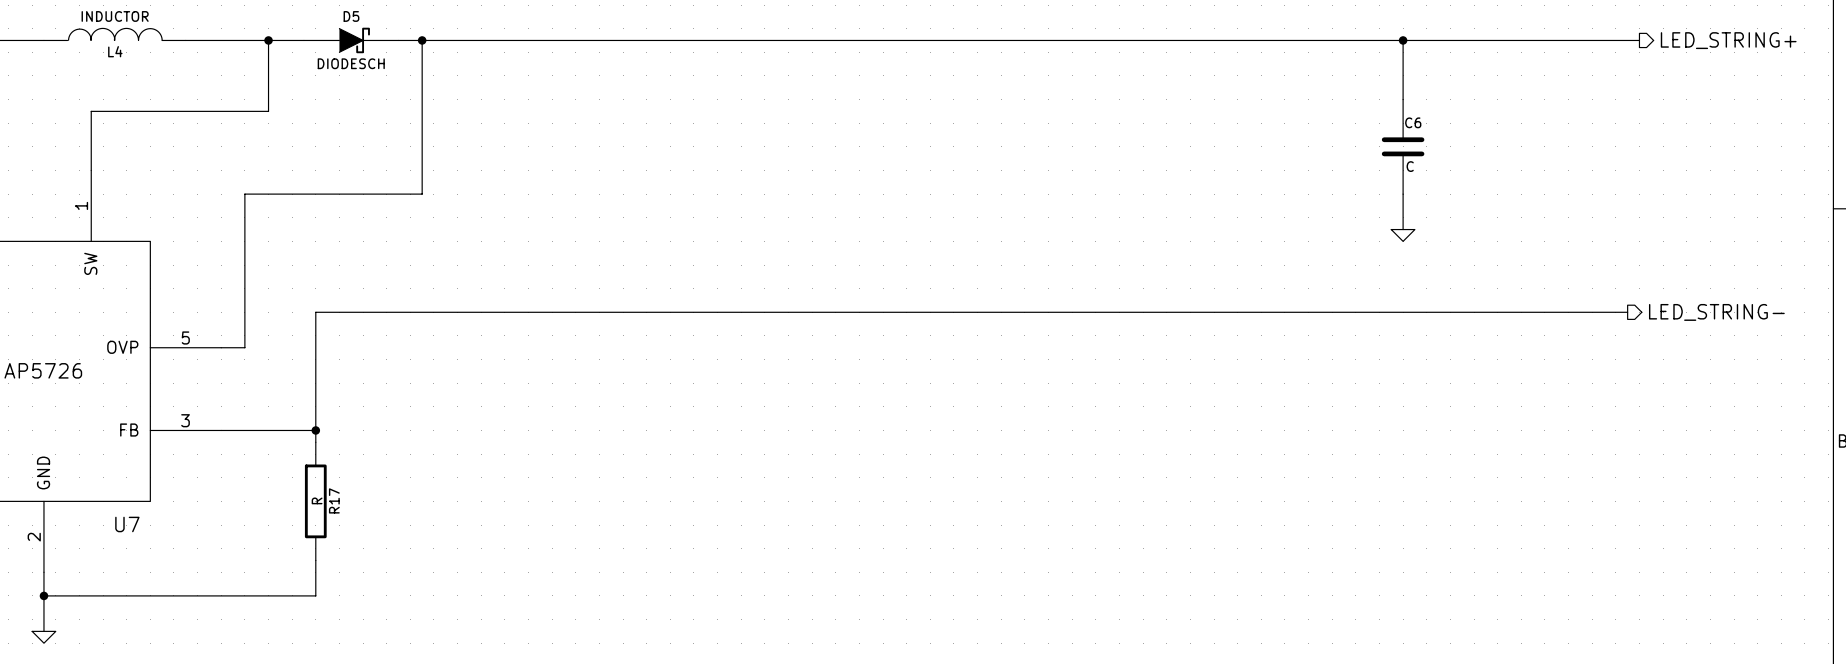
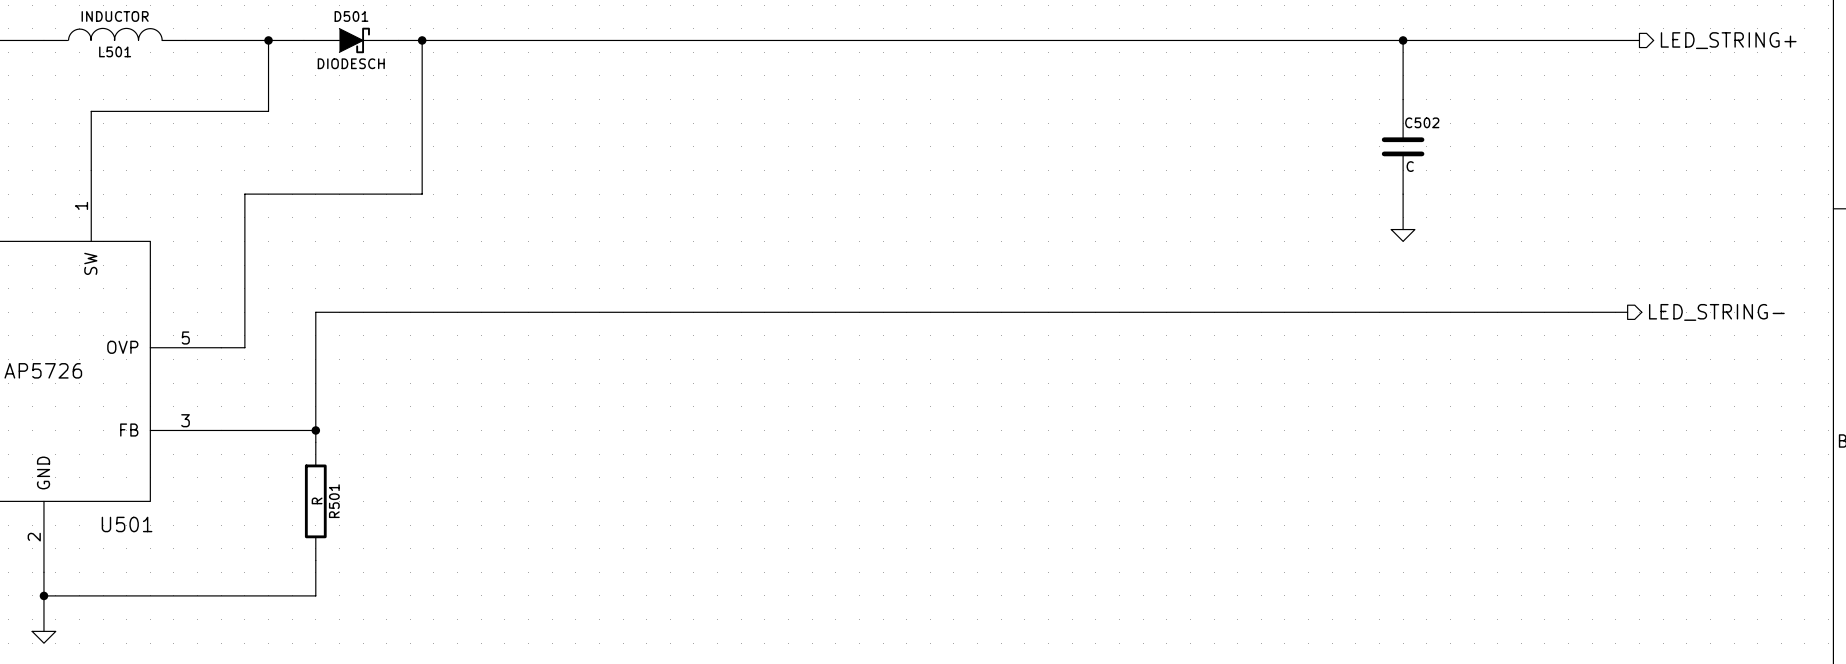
D5 name: D5 (351, 16) -> D501 (351, 16)
L4 name: L4 (115, 51) -> L501 (115, 51)
C6 name: C6 (1413, 122) -> C502 (1422, 122)
R17 name: R17 (334, 500) -> R501 (334, 501)
U7 name: U7 (127, 524) -> U501 (127, 524)

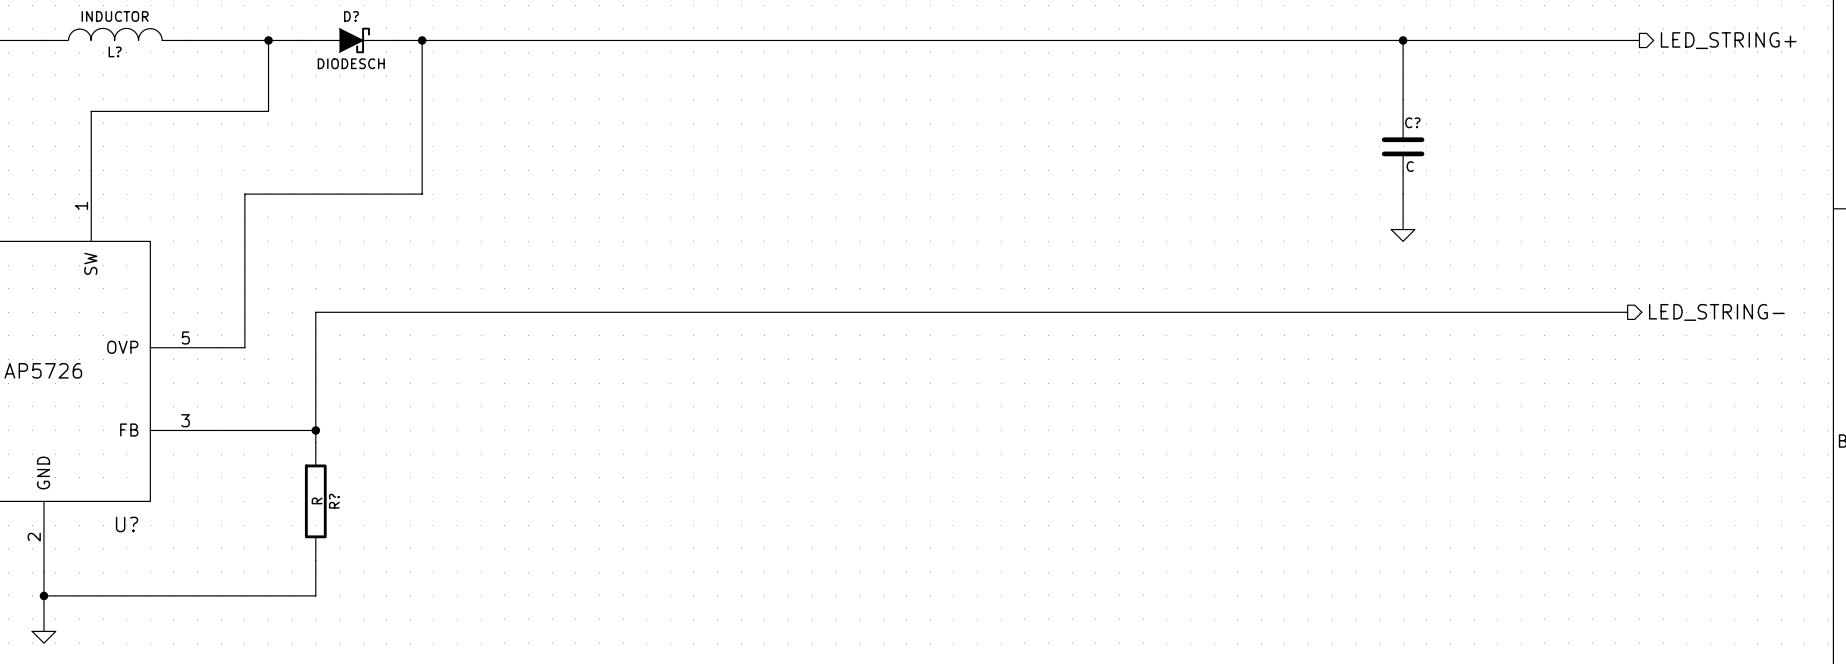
D501 name: D501 (351, 16) -> D? (351, 16)
L501 name: L501 (115, 51) -> L? (115, 51)
C502 name: C502 (1422, 122) -> C? (1412, 122)
R501 name: R501 (334, 501) -> R? (334, 501)
U501 name: U501 (127, 524) -> U? (127, 524)

